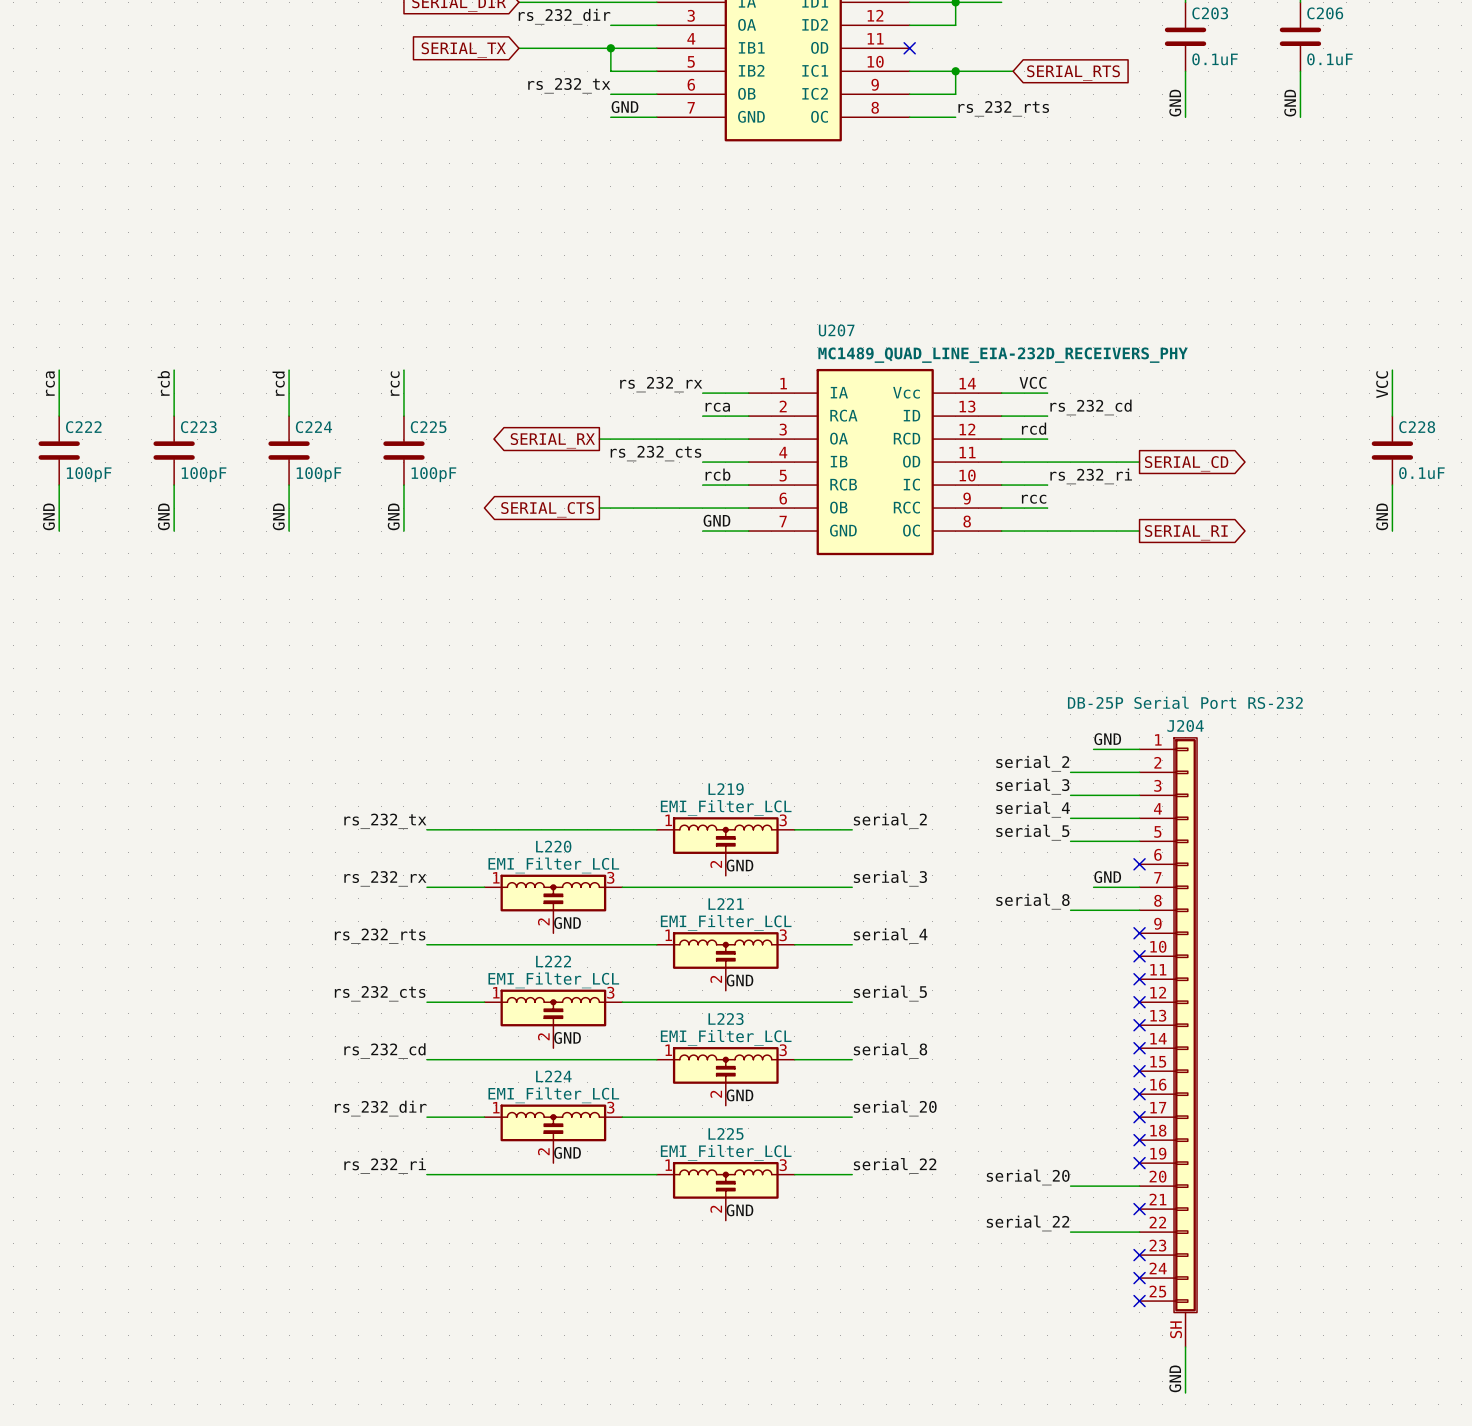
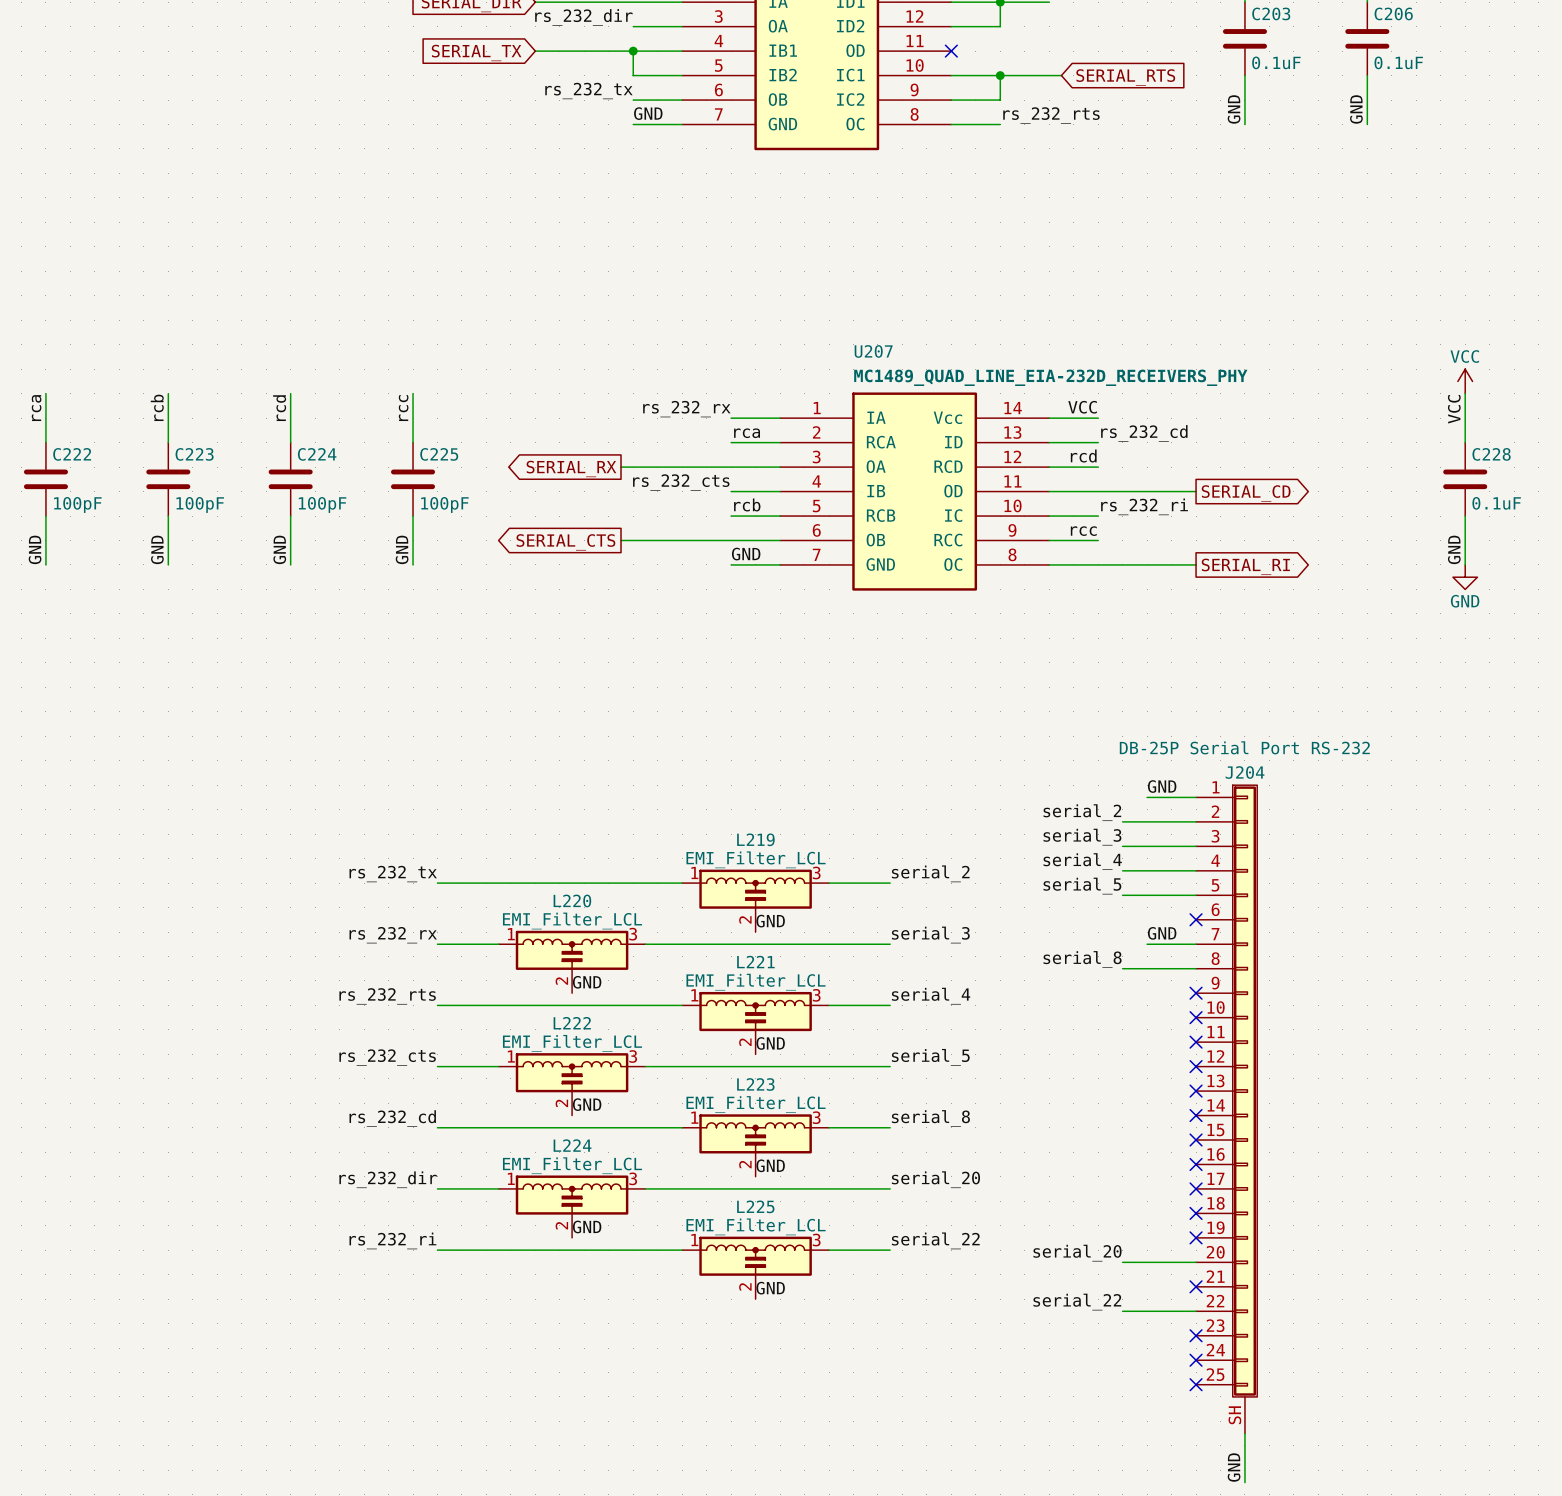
power symbol: none -> VCC (1465, 381)
power symbol: none -> GND (1465, 577)

